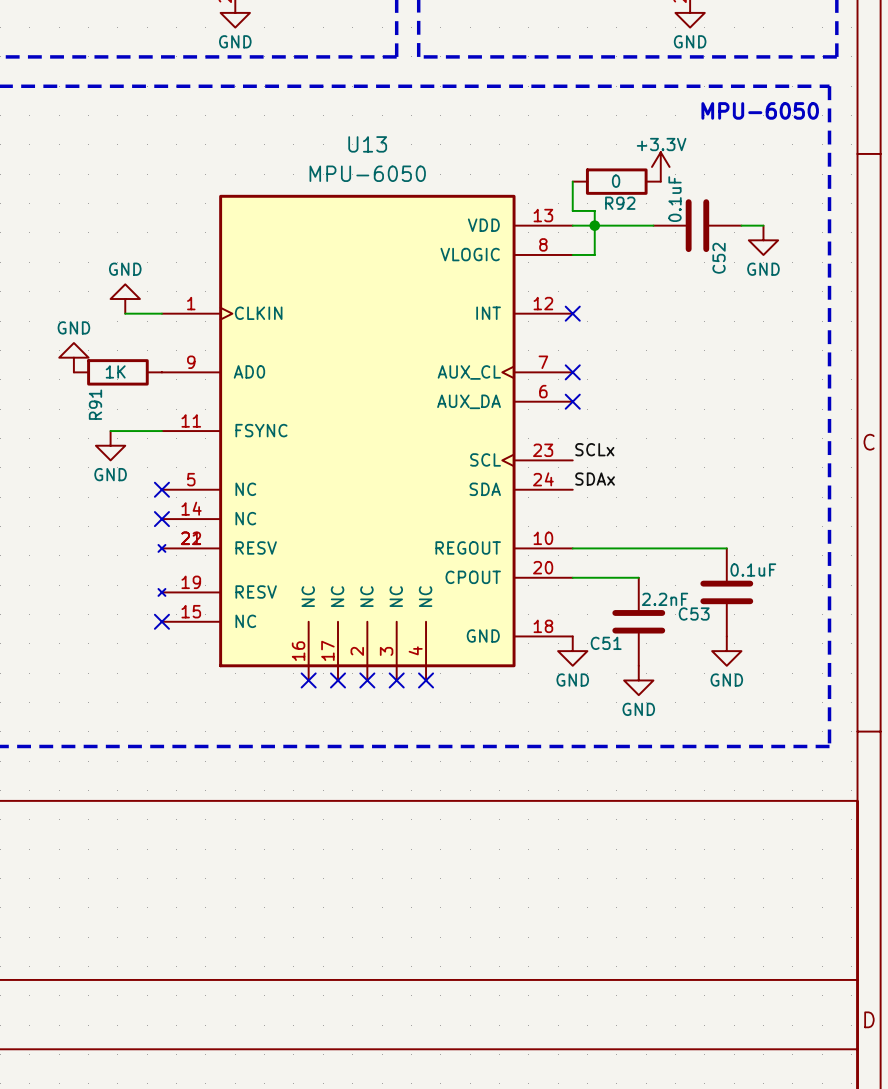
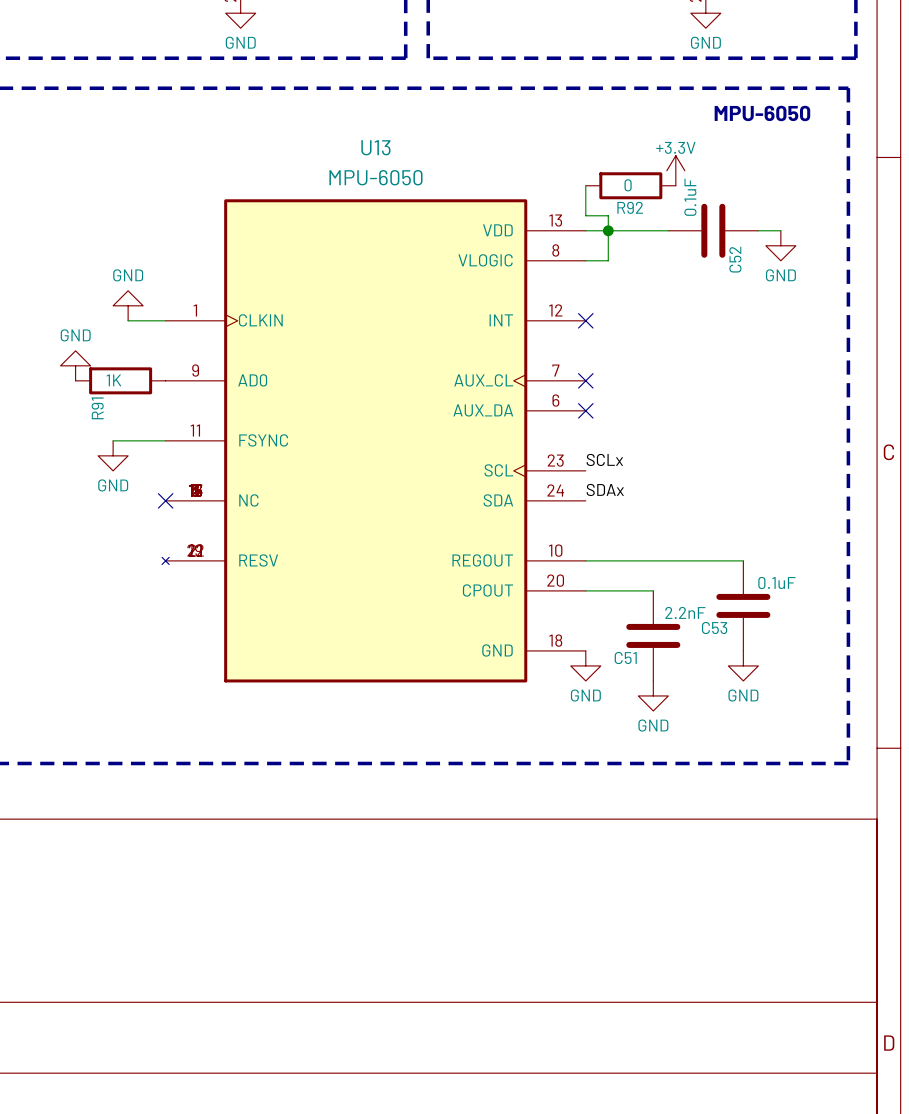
U13 symbol: [158, 194, 573, 681] -> [162, 199, 586, 683]
no-connect mark: (161, 519) -> none
no-connect mark: (161, 621) -> none
no-connect mark: (308, 680) -> none
no-connect mark: (338, 680) -> none
no-connect mark: (367, 680) -> none
no-connect mark: (396, 680) -> none
no-connect mark: (426, 680) -> none

